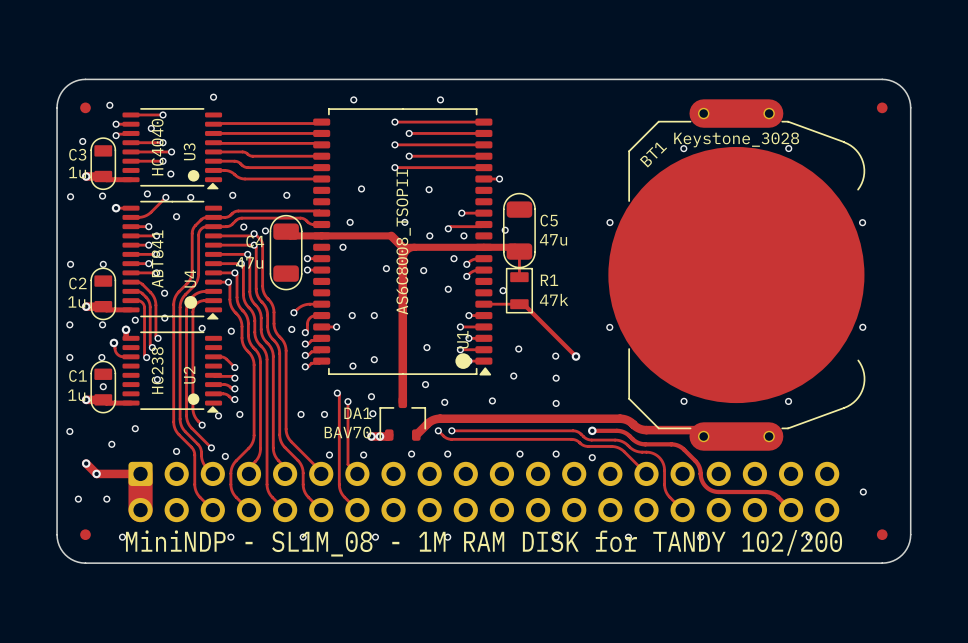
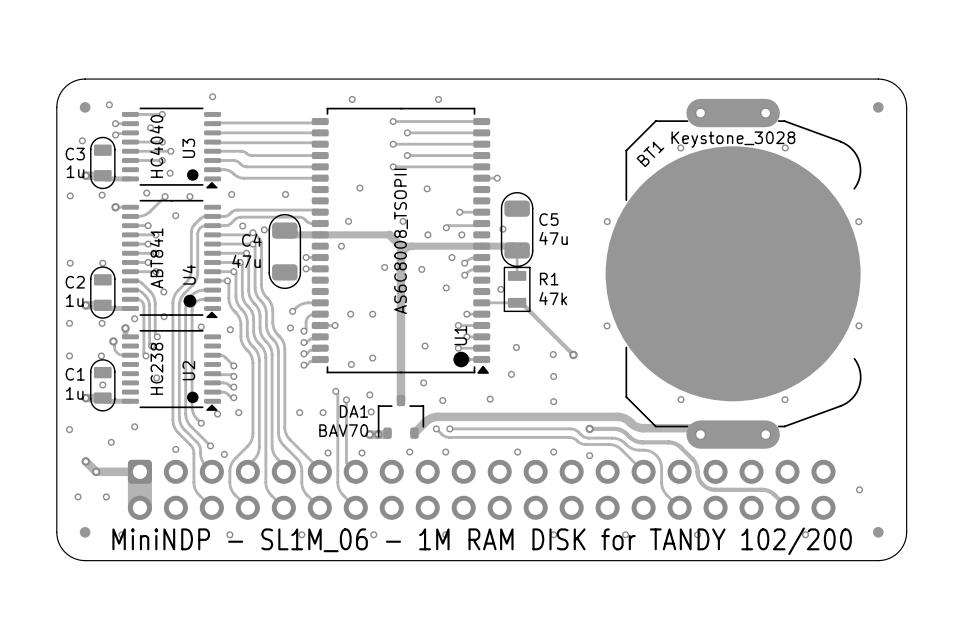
text: MiniNDP - SL1M_08 - 1M RAM DISK for TANDY 102/200 (484, 543) -> MiniNDP - SL1M_06 - 1M RAM DISK for TANDY 102/200 (482, 541)

